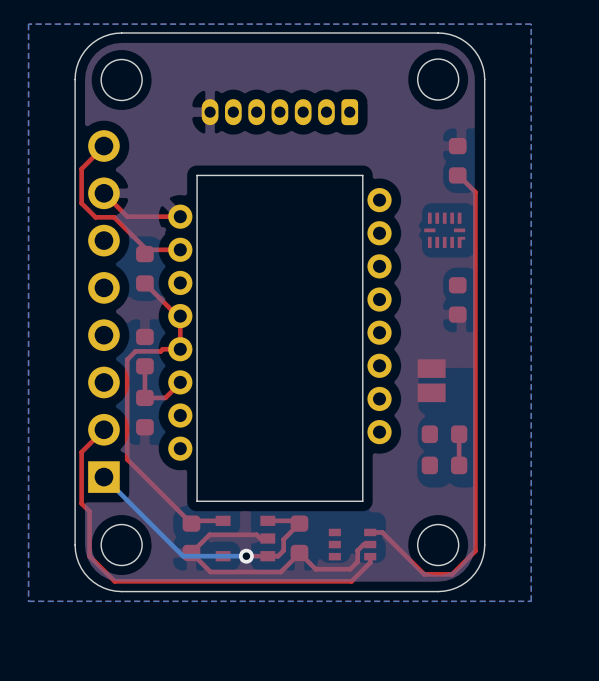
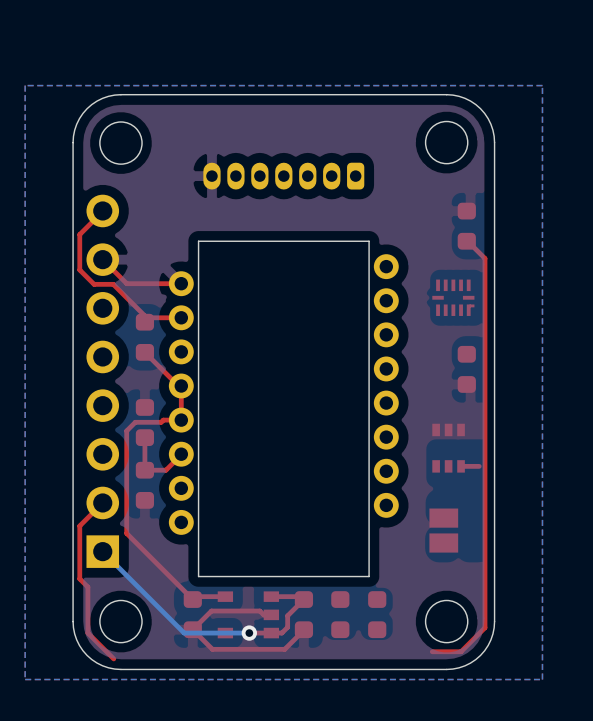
part footprint: [417, 359, 446, 403] -> [432, 423, 465, 473]
top track: none -> (479, 466) (461, 466)
part: (444, 434) -> none
top track: (459, 434) (459, 465) -> none
part: none -> (443, 530)
part: (444, 465) -> none
top track: (370, 532) (382, 532) (424, 574) -> none
part: none -> (340, 614)
part: none -> (377, 614)
part: (352, 544) -> none
top track: (370, 544) (363, 544) (357, 550) (357, 561) (350, 569) (315, 569) (299, 552) -> none
top track: (370, 556) (370, 562) (351, 581) (114, 581) -> none

